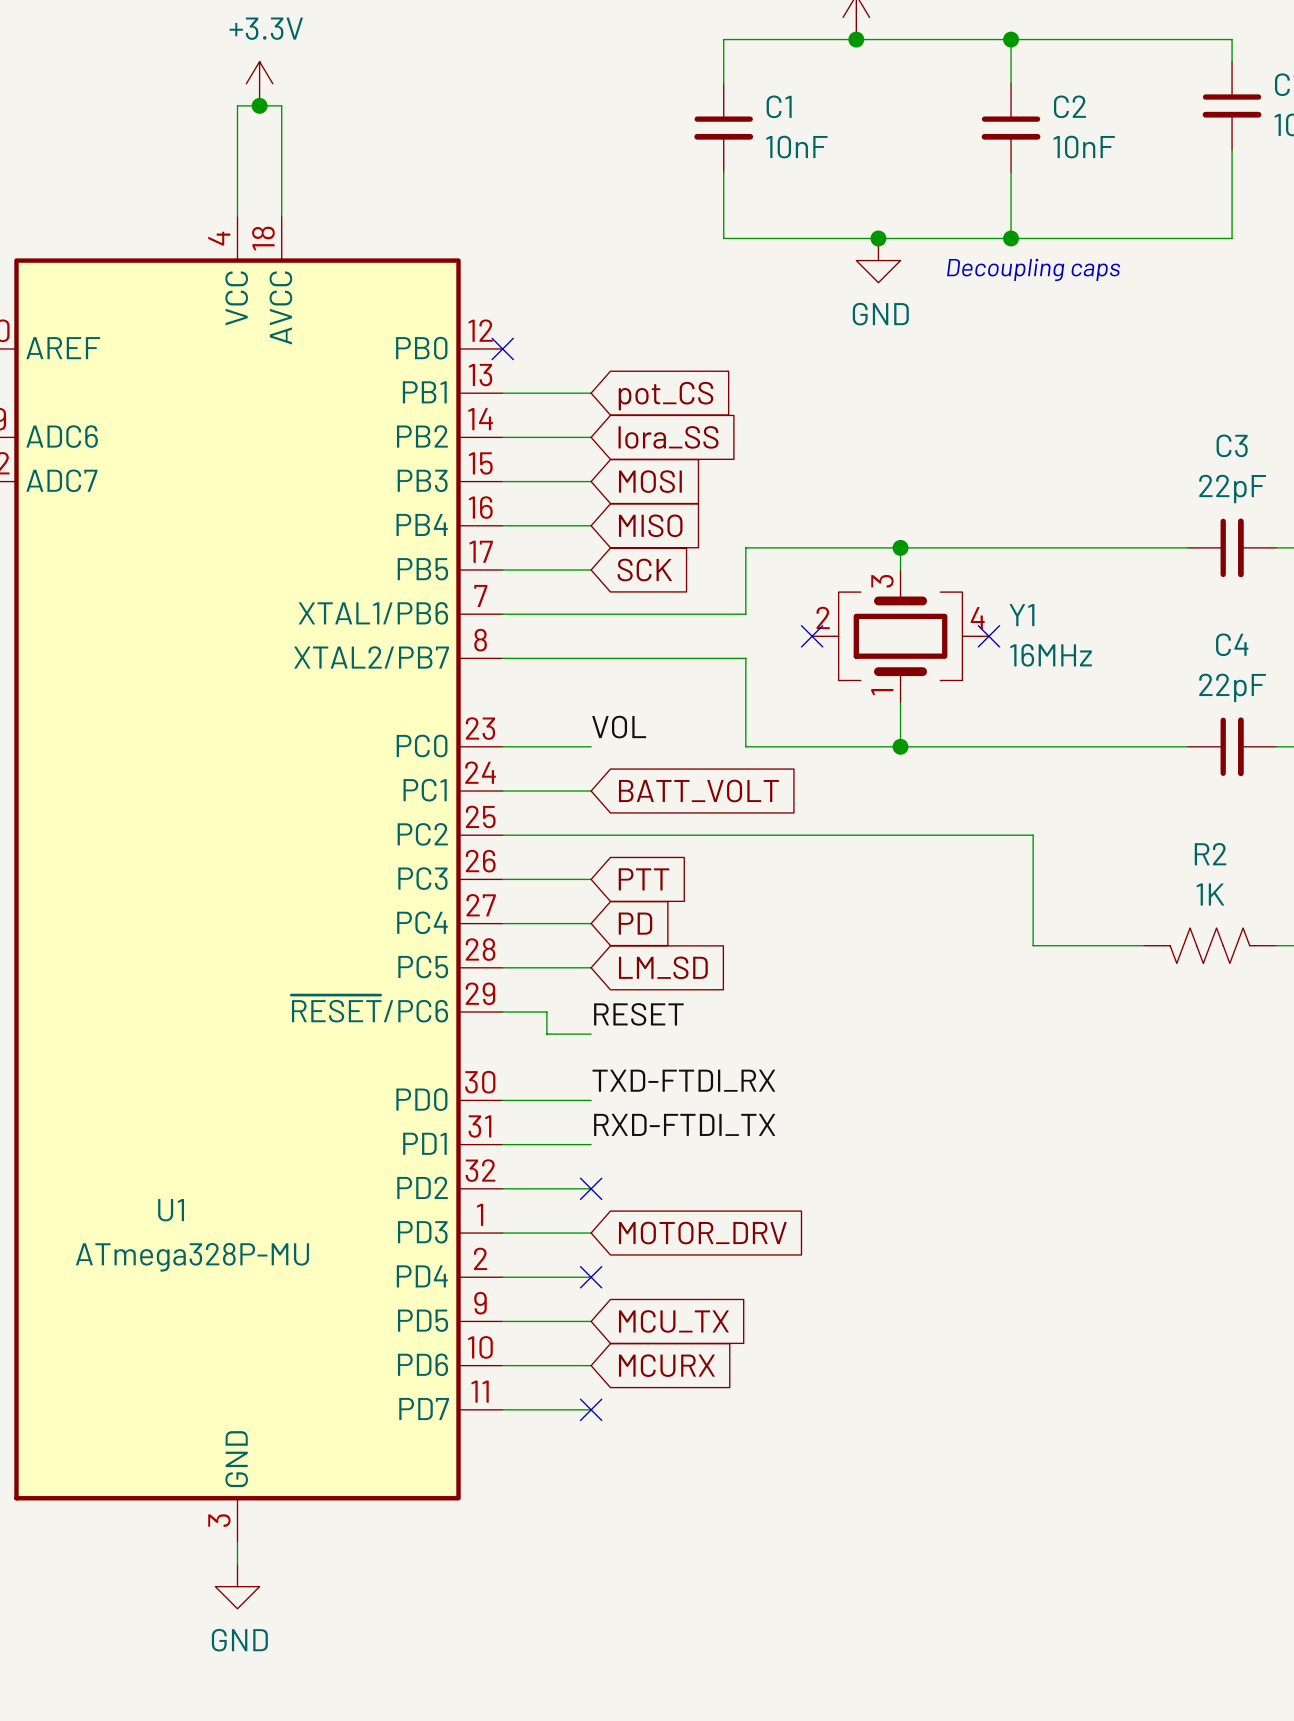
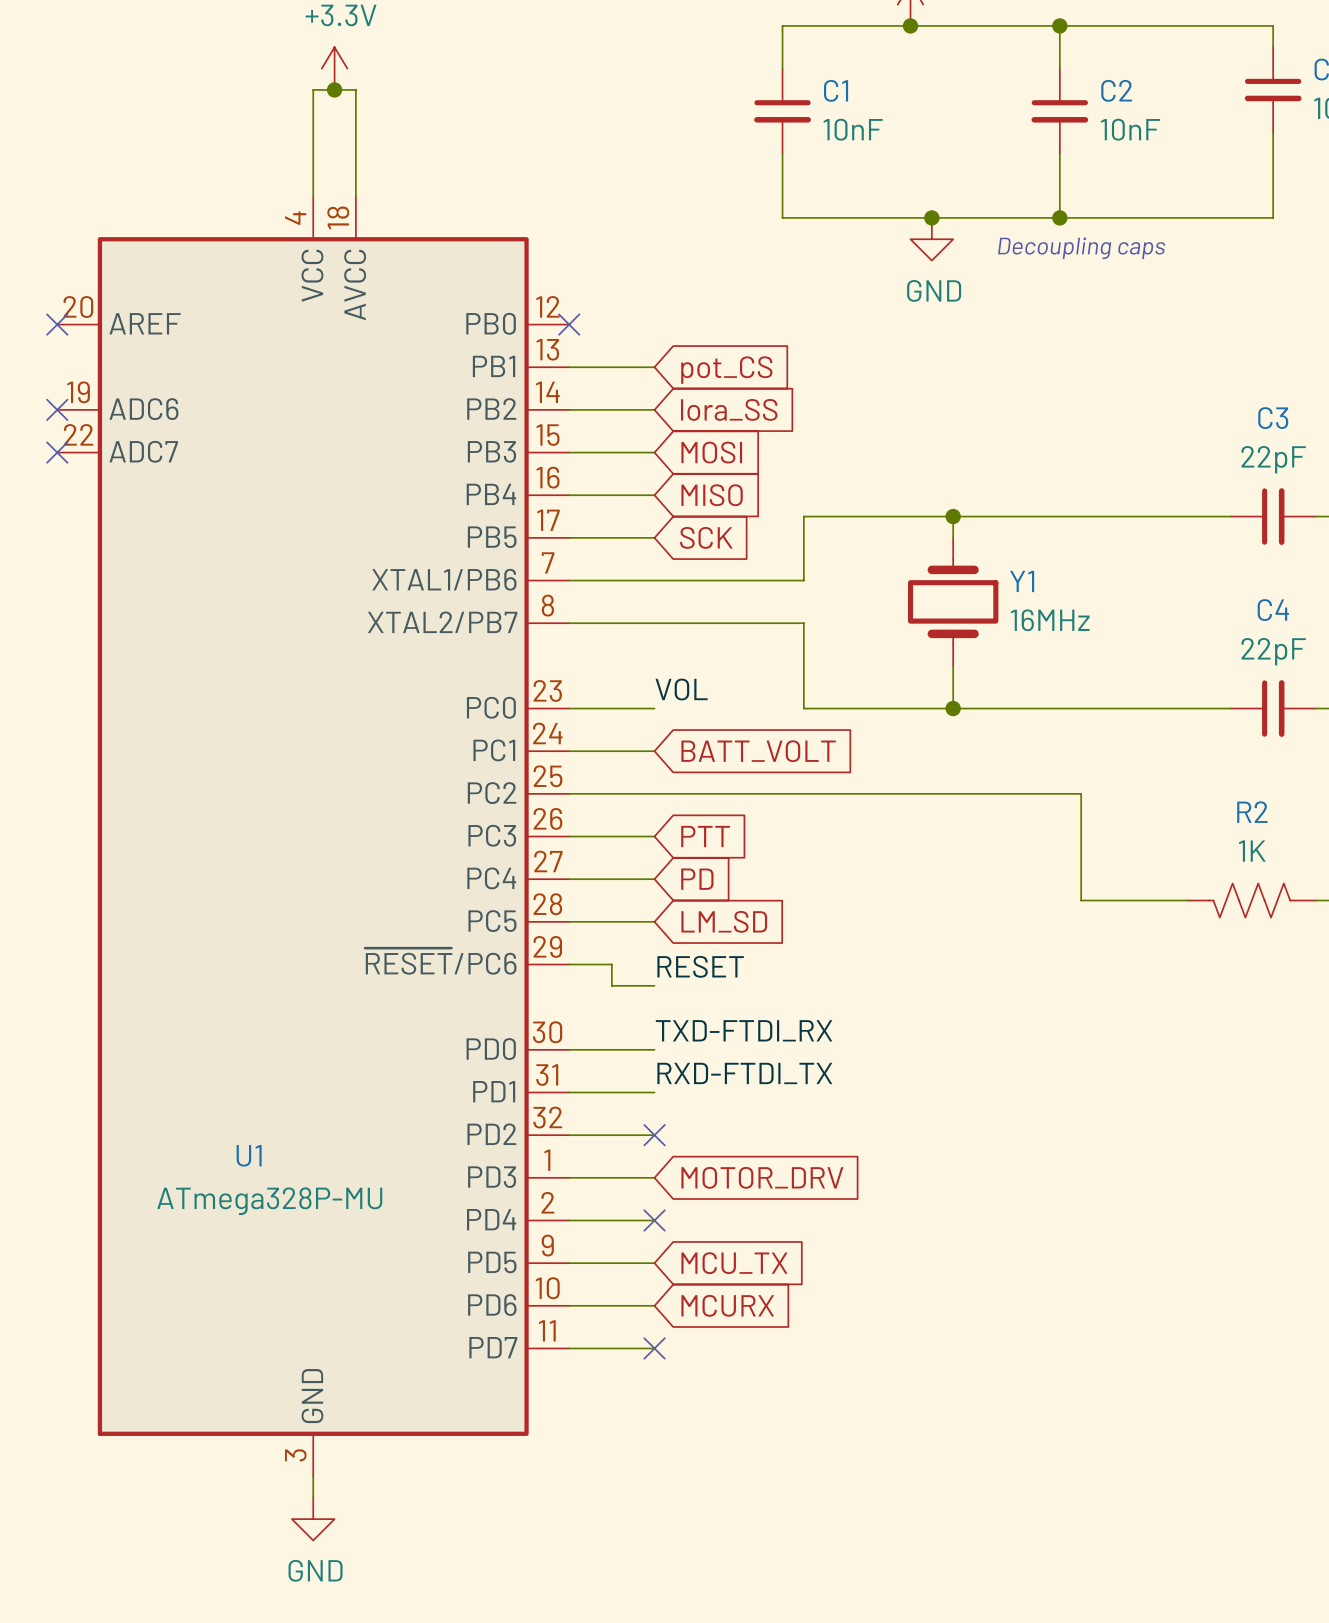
Y1 symbol: [812, 569, 989, 703] -> [907, 537, 999, 666]
Y1 name position: Y1 (1021, 615) -> Y1 (1022, 581)
no-connect mark: (812, 636) -> none
no-connect mark: (988, 636) -> none
Y1 value position: 16MHz (1051, 655) -> 16MHz (1050, 620)

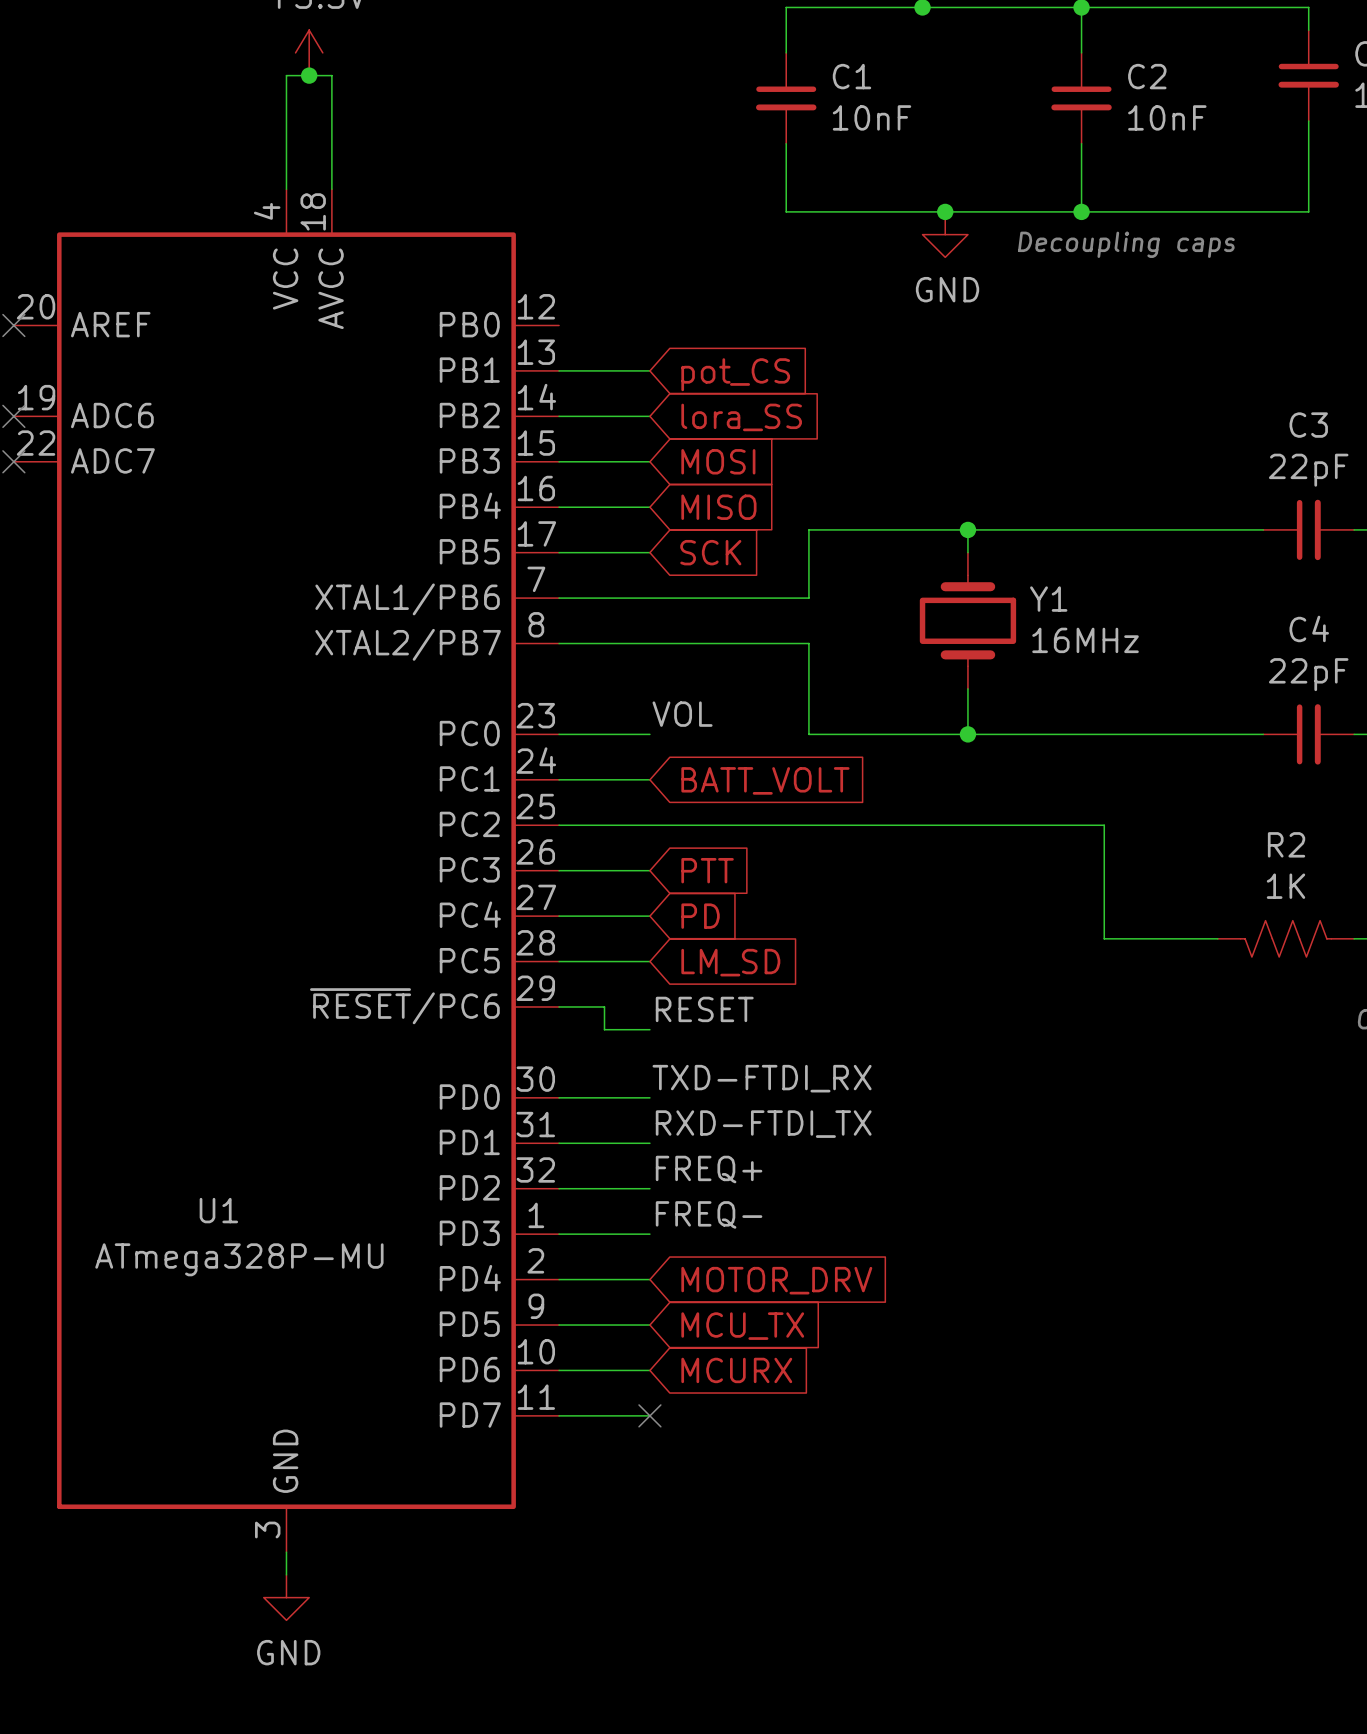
no-connect mark: (569, 324) -> none
label: none -> FREQ+ (709, 1169)
no-connect mark: (654, 1135) -> none
label: none -> FREQ- (709, 1214)
global label position: MOTOR_DRV (762, 1177) -> MOTOR_DRV (776, 1280)
no-connect mark: (654, 1220) -> none

